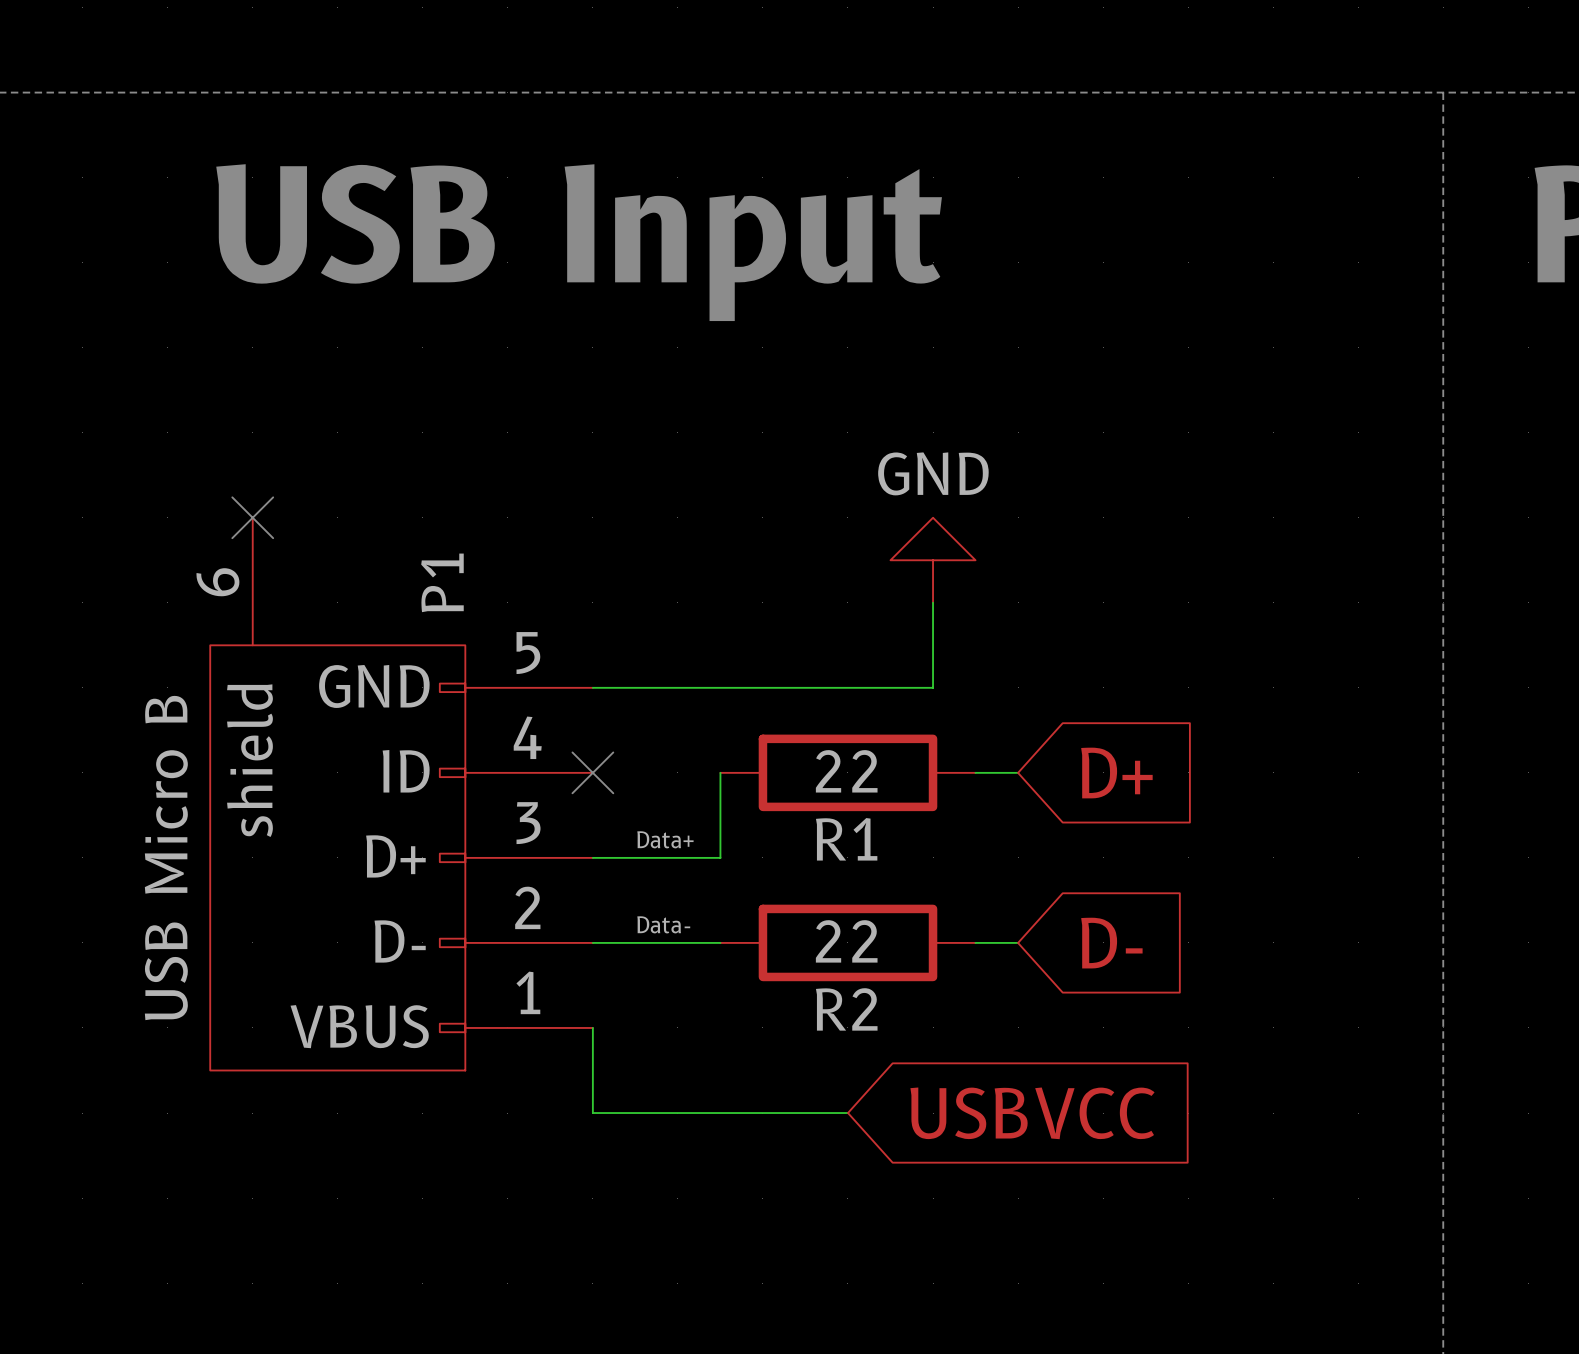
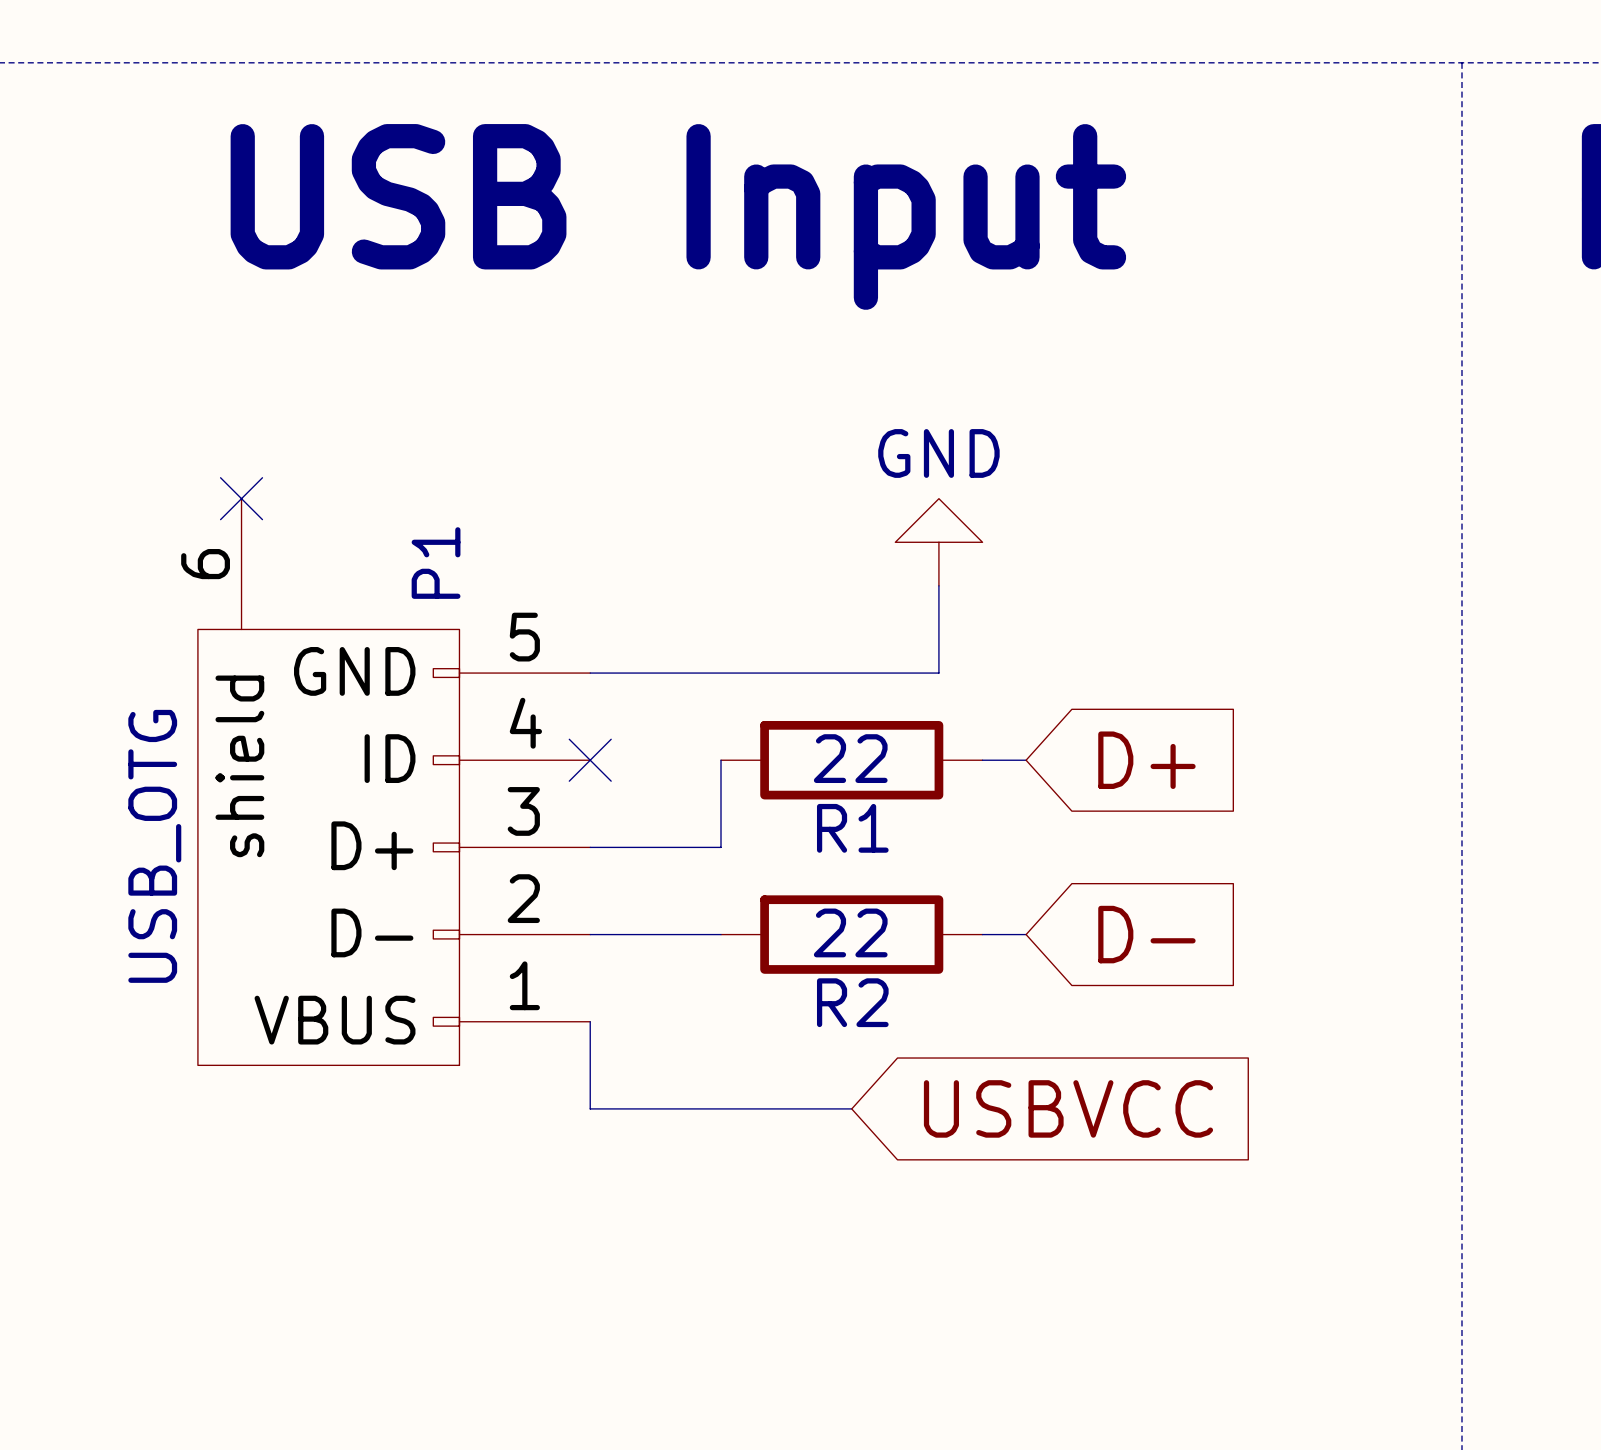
label: Data+ (665, 839) -> none
P1 value: USB Micro B (166, 858) -> USB_OTG (154, 846)
label: Data- (663, 924) -> none

